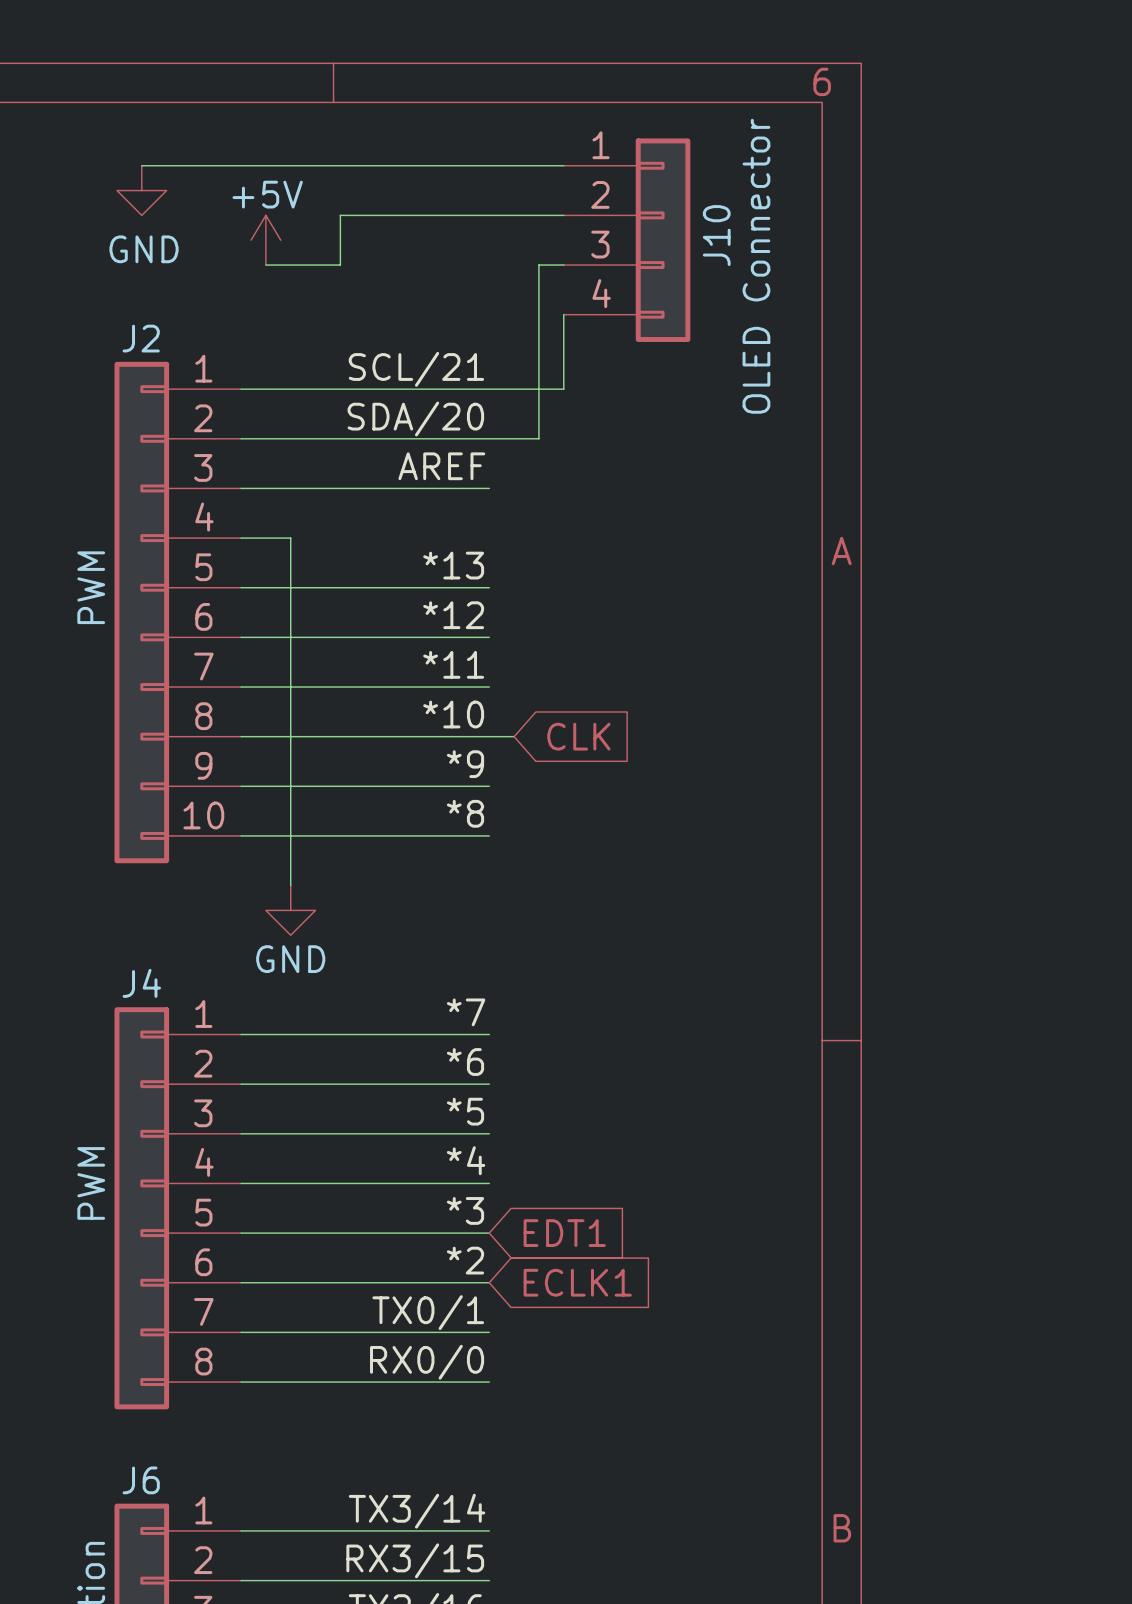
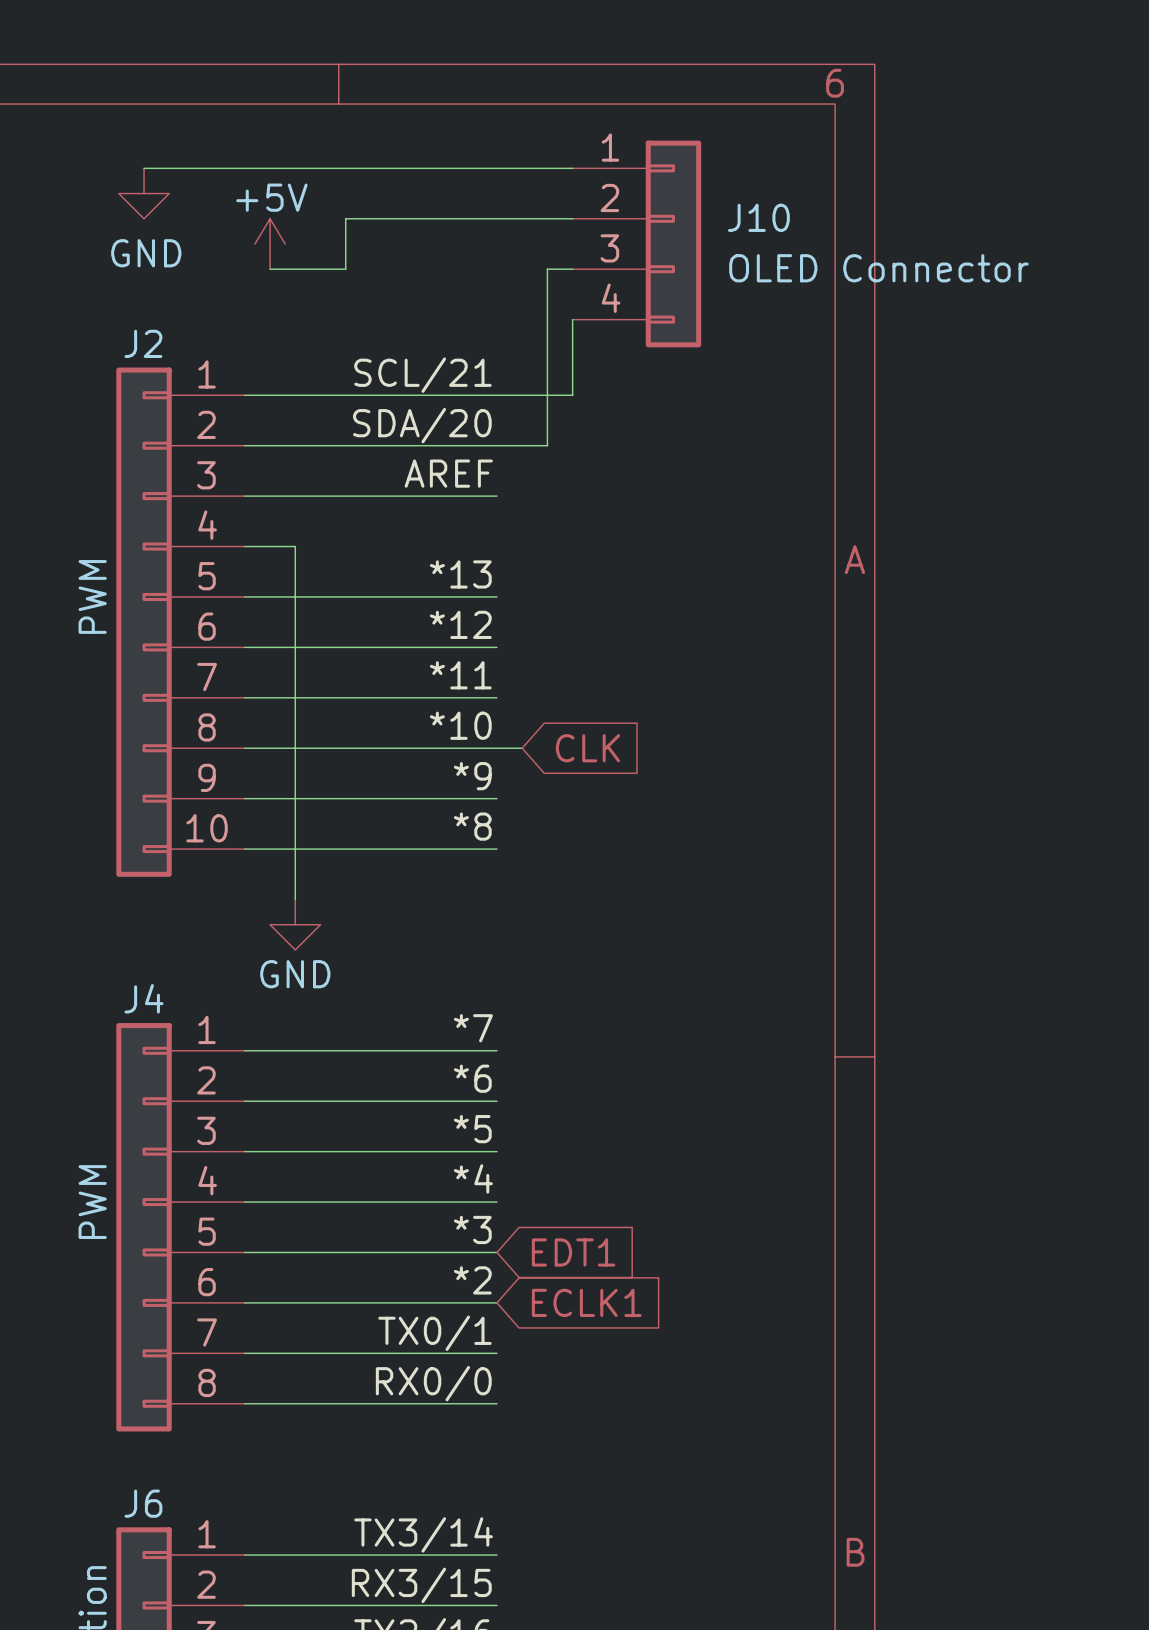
J10 name rotation: 0° (716, 235) -> 90° clockwise (758, 217)
J10 value rotation: 0° (756, 266) -> 90° clockwise (878, 268)

